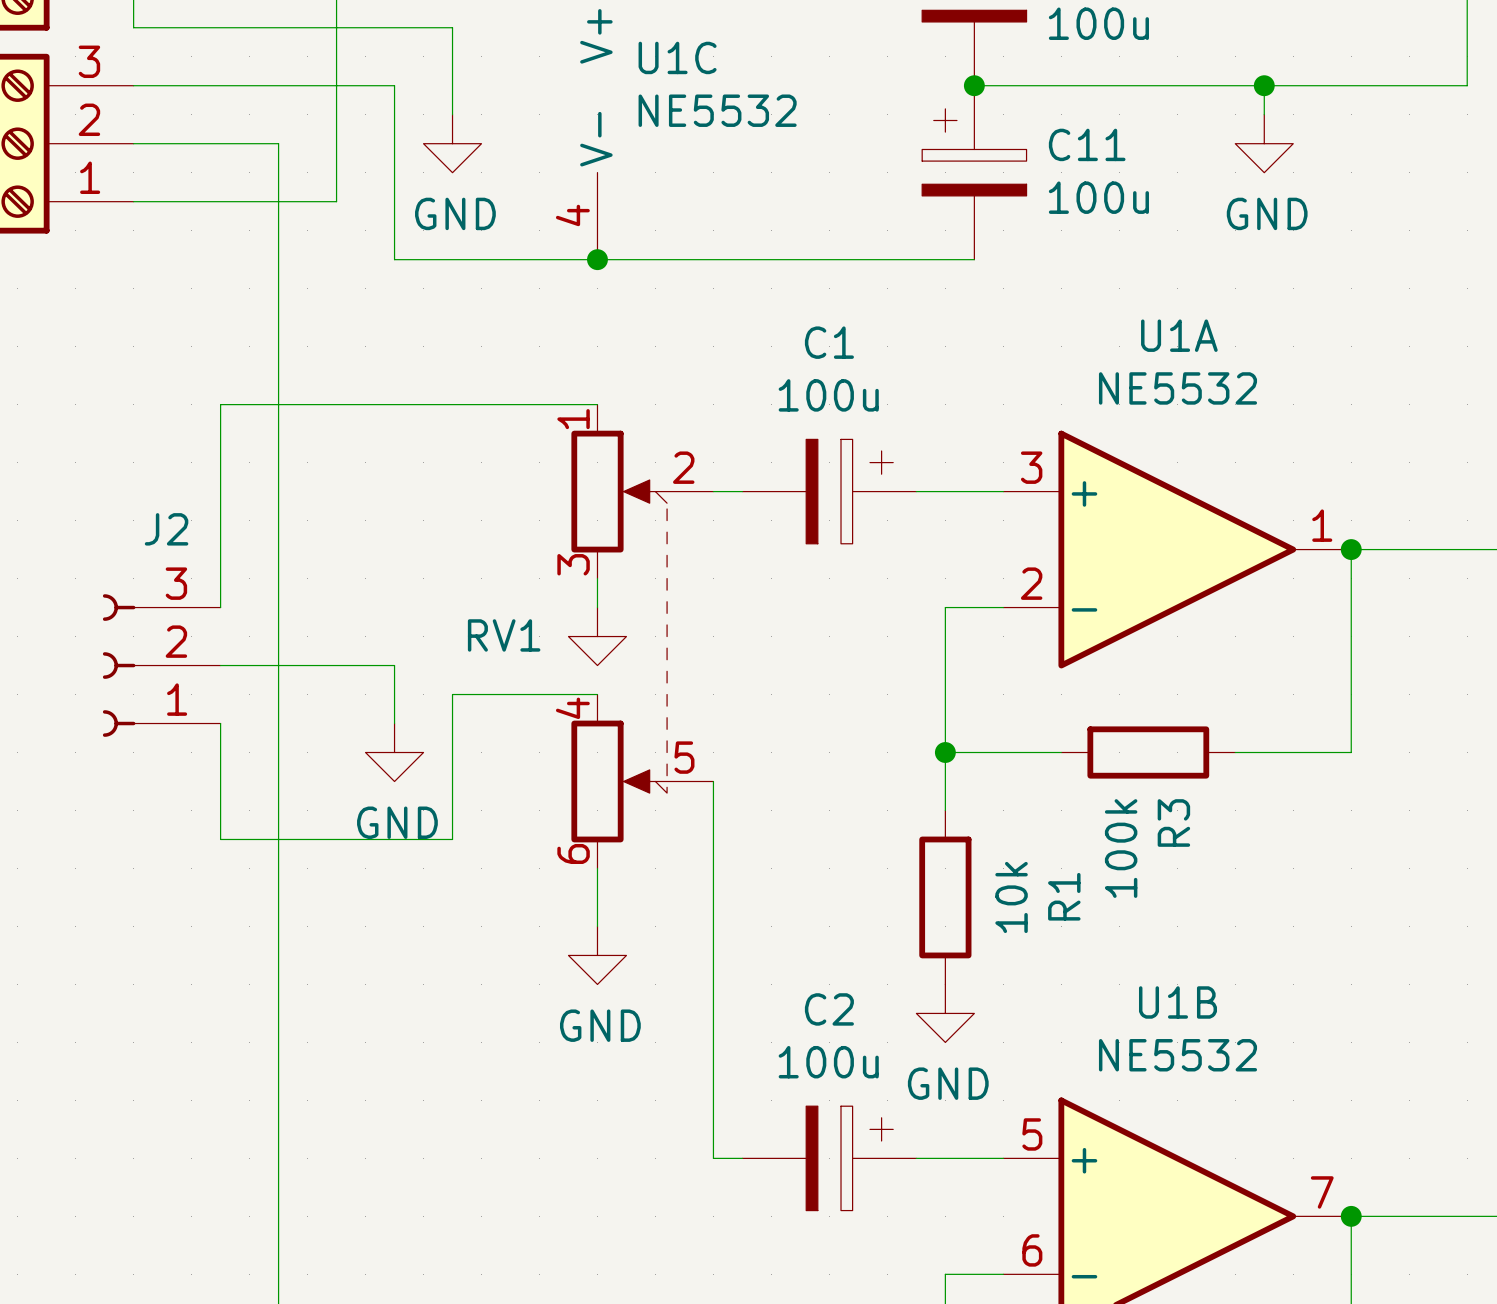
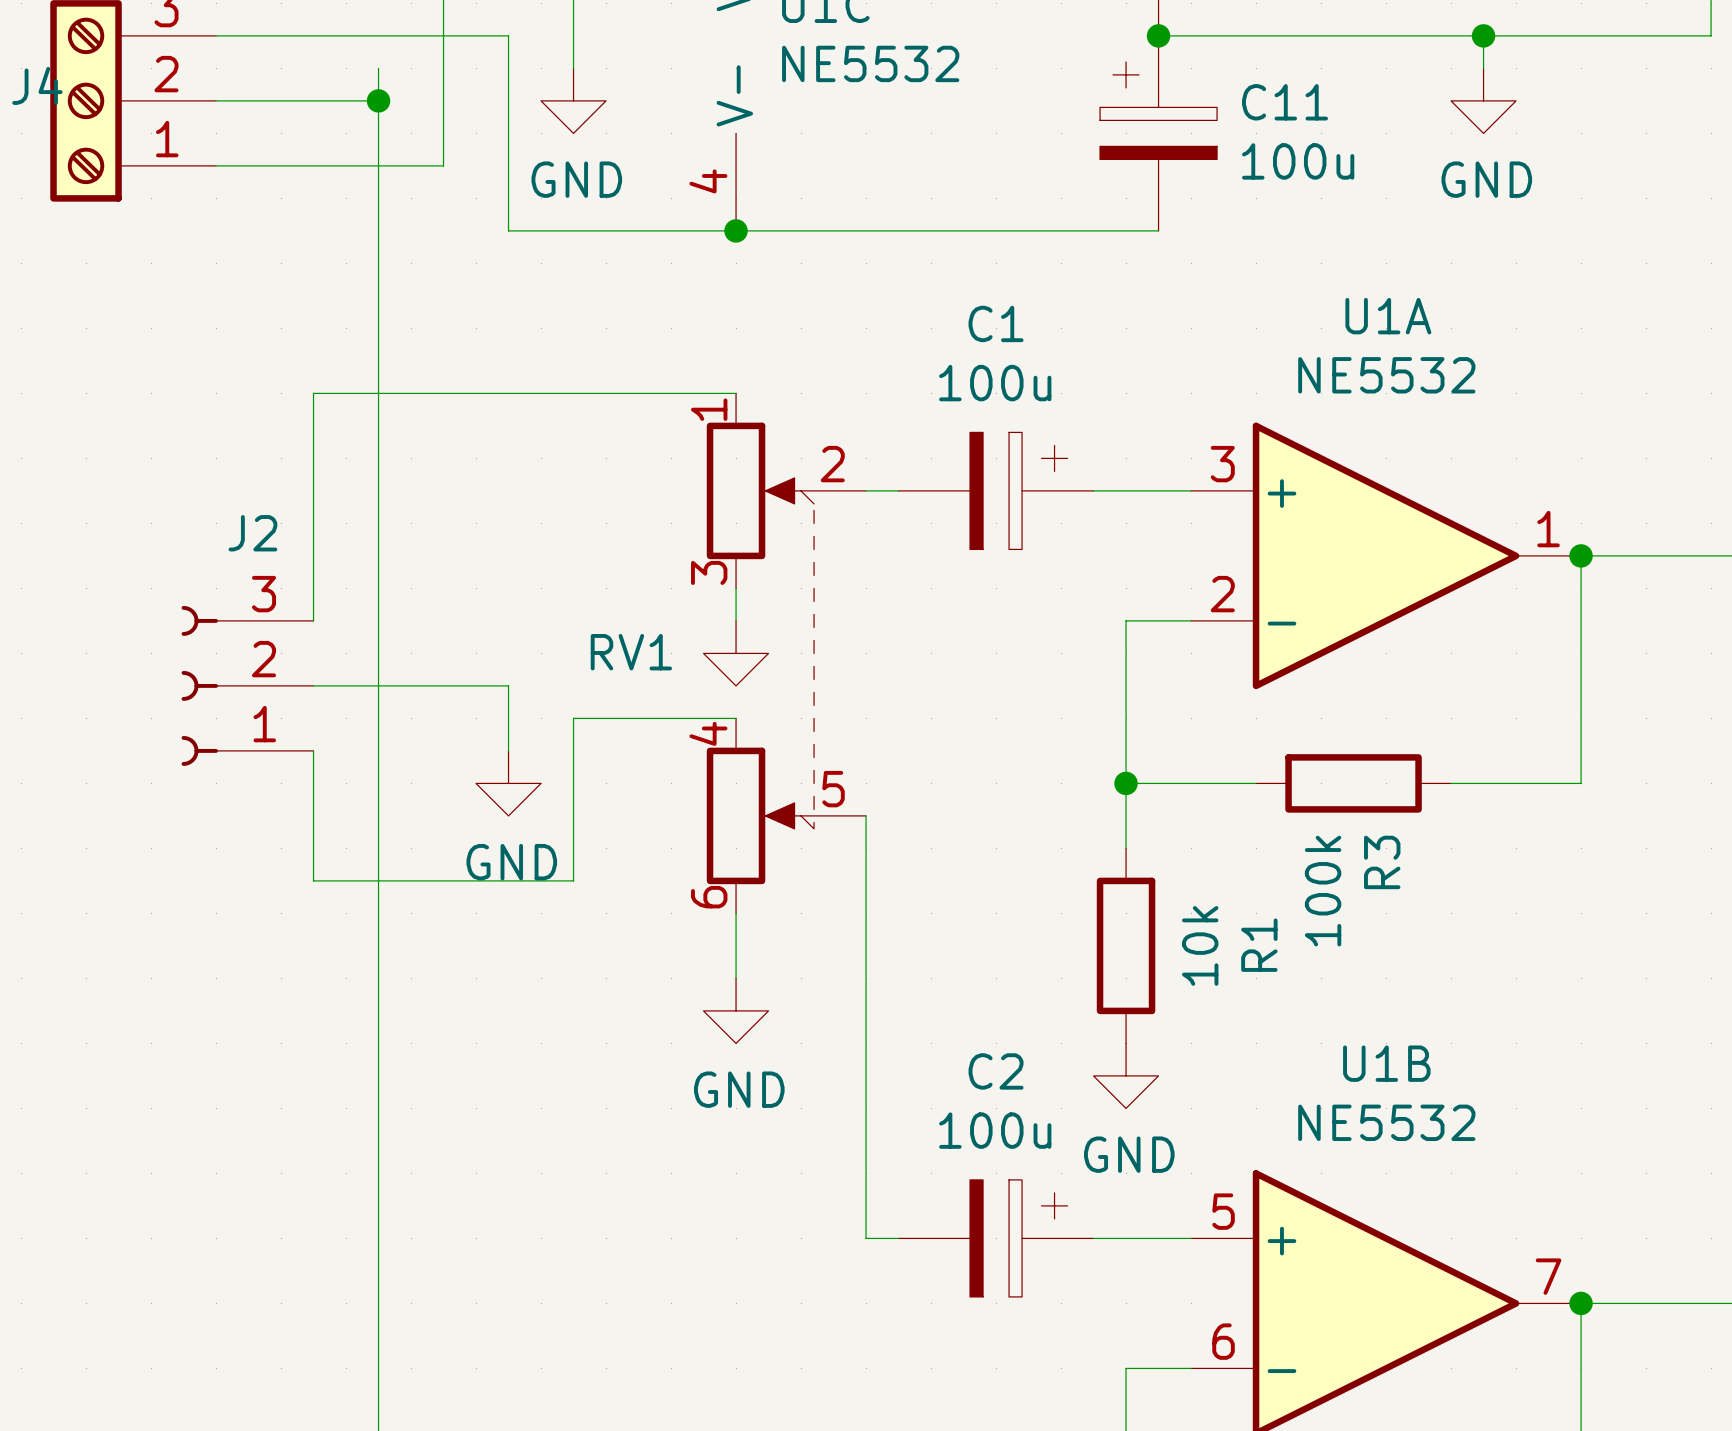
wire: none -> (378, 68) (378, 100)
junction: none -> (378, 100)

